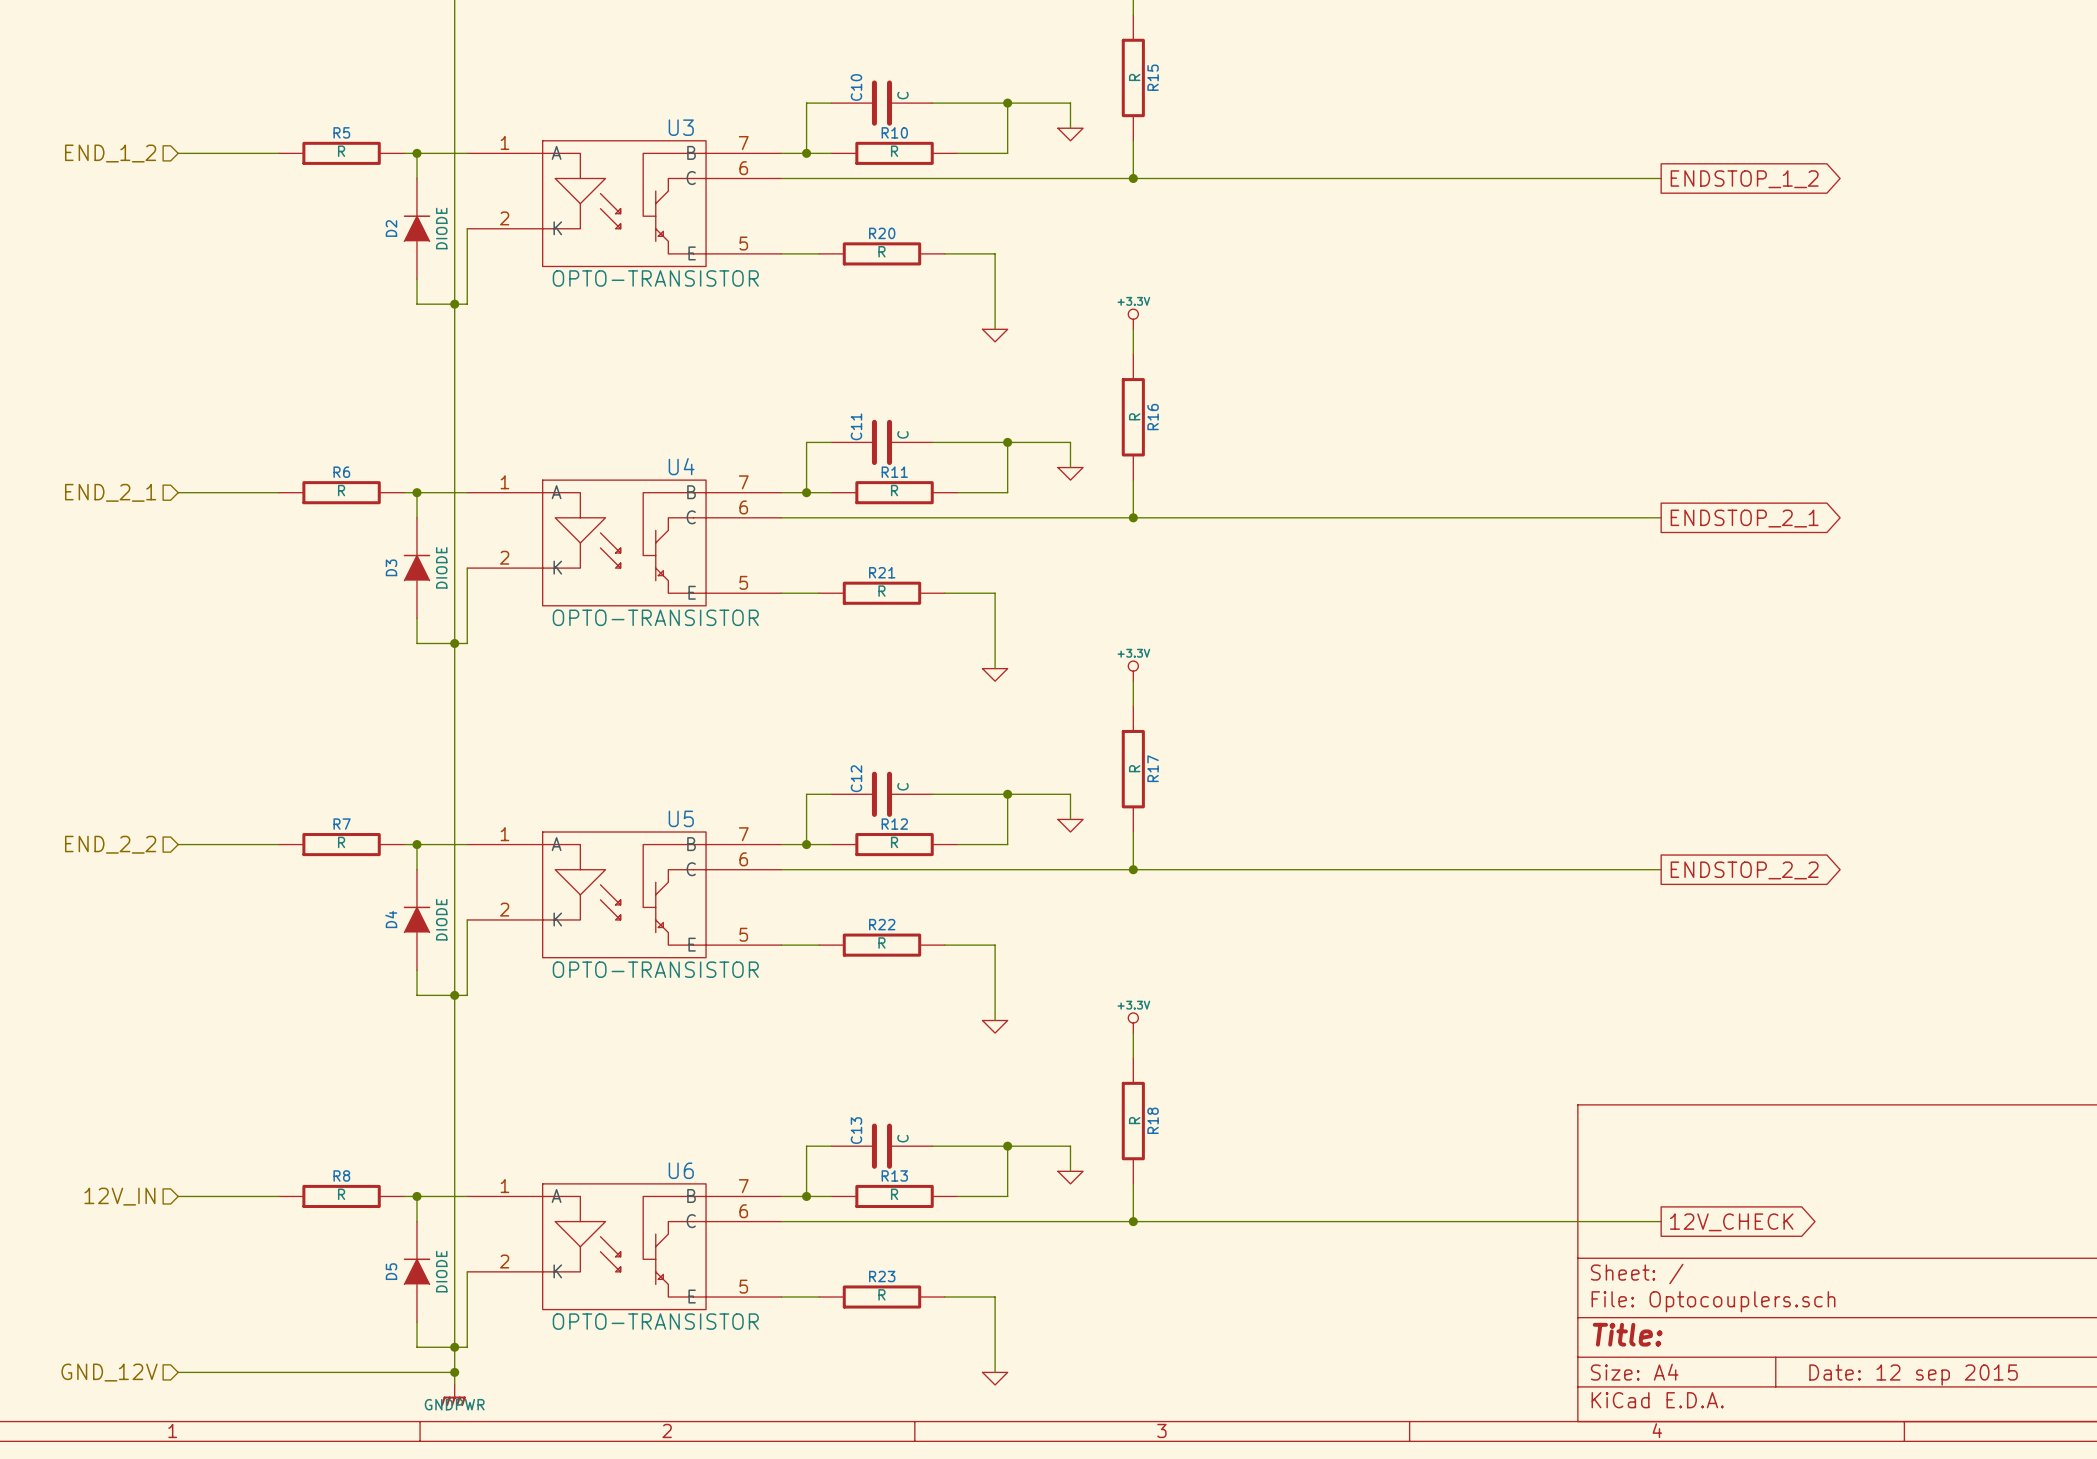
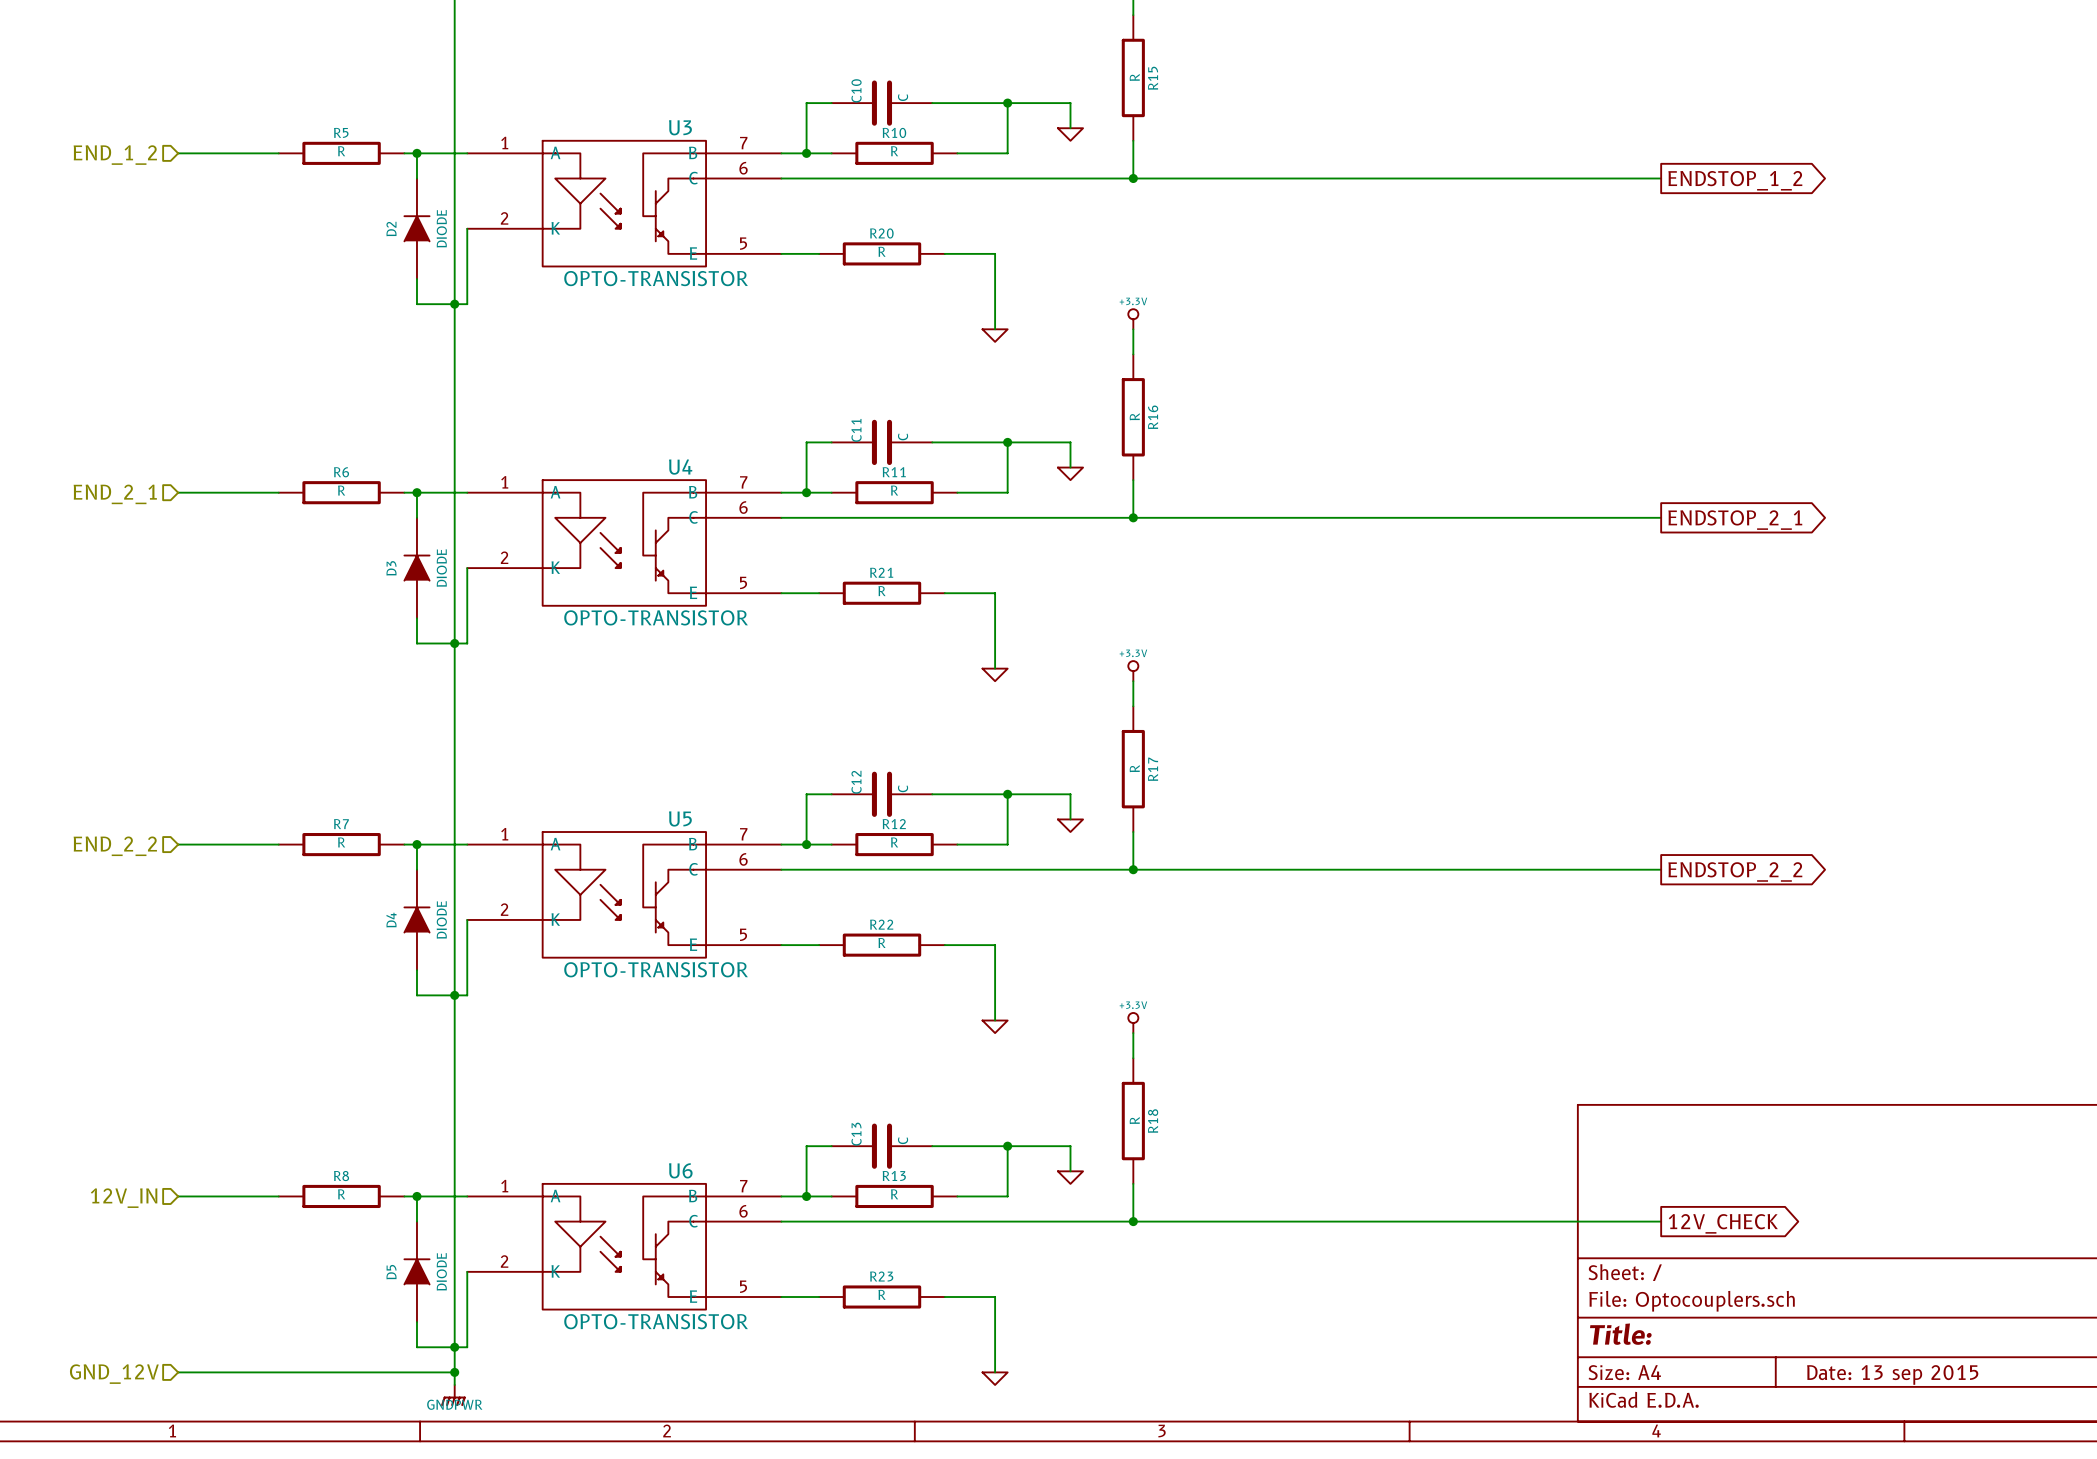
title block: Date: 12 sep 2015 (1913, 1374) -> Date: 13 sep 2015 (1892, 1374)

